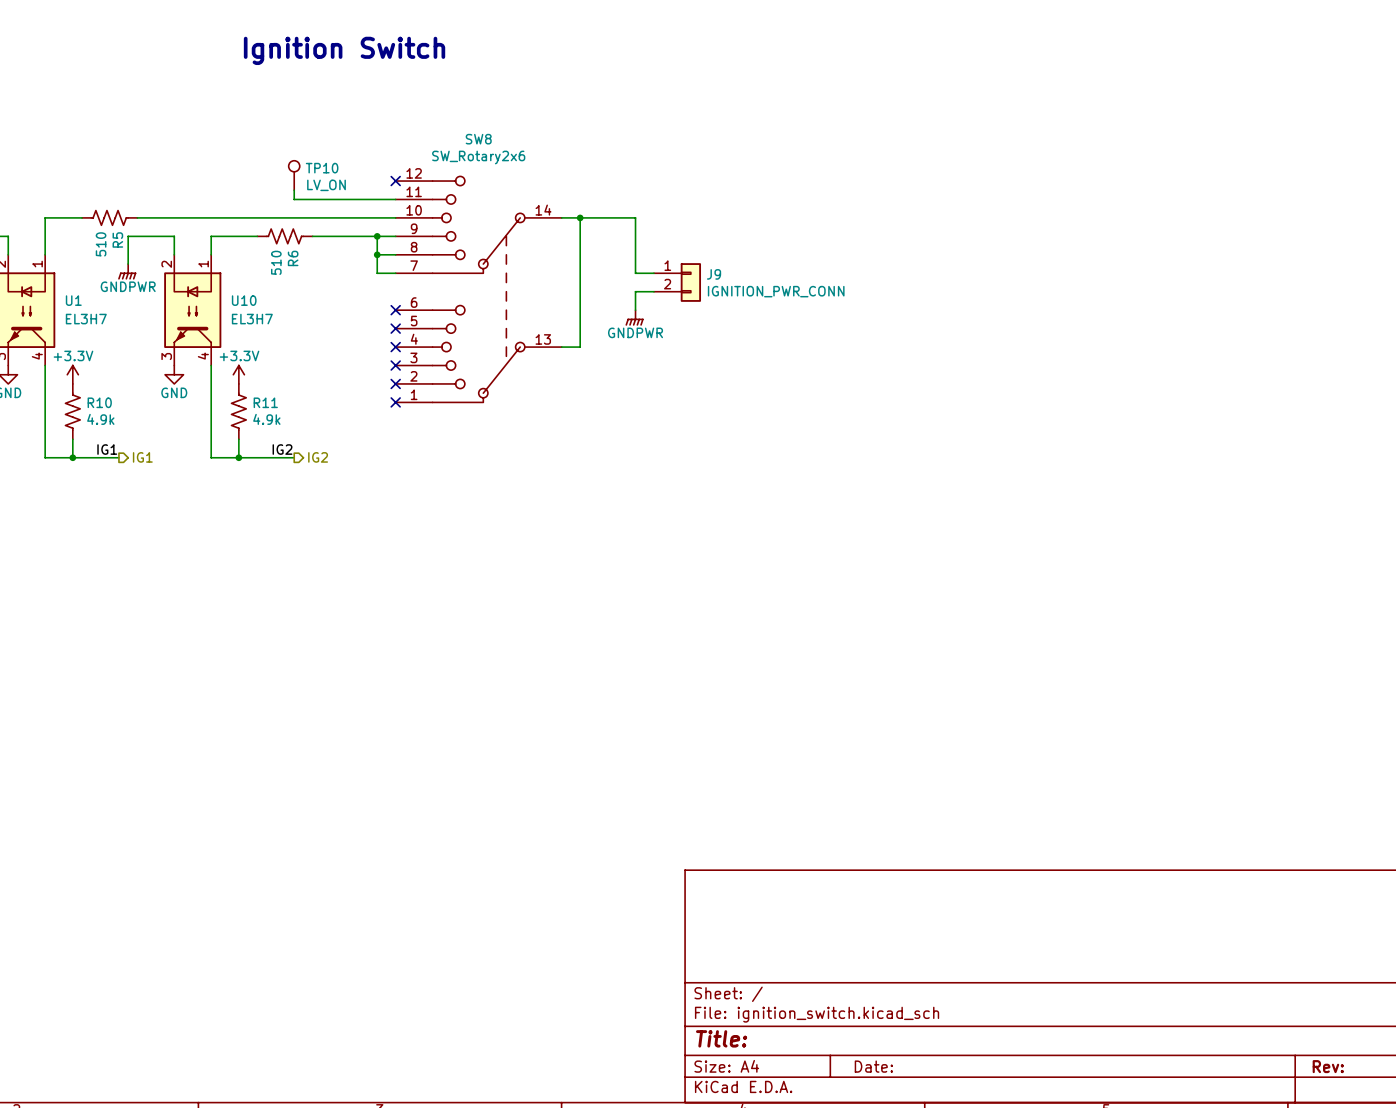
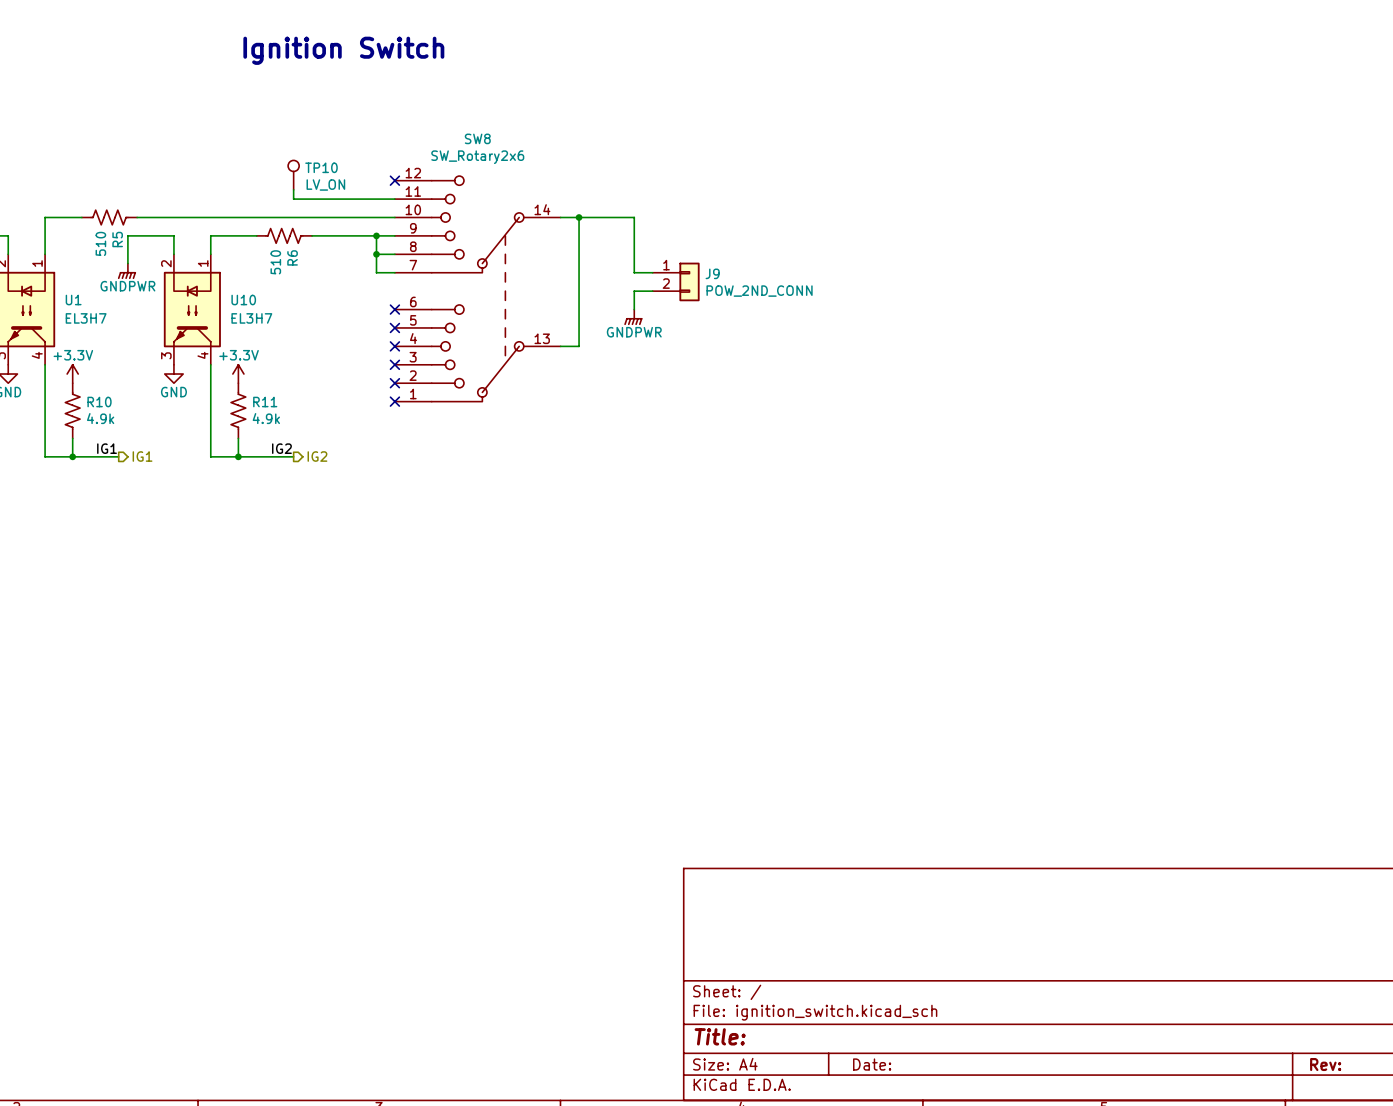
J9 value: IGNITION_PWR_CONN (776, 291) -> POW_2ND_CONN (759, 291)

